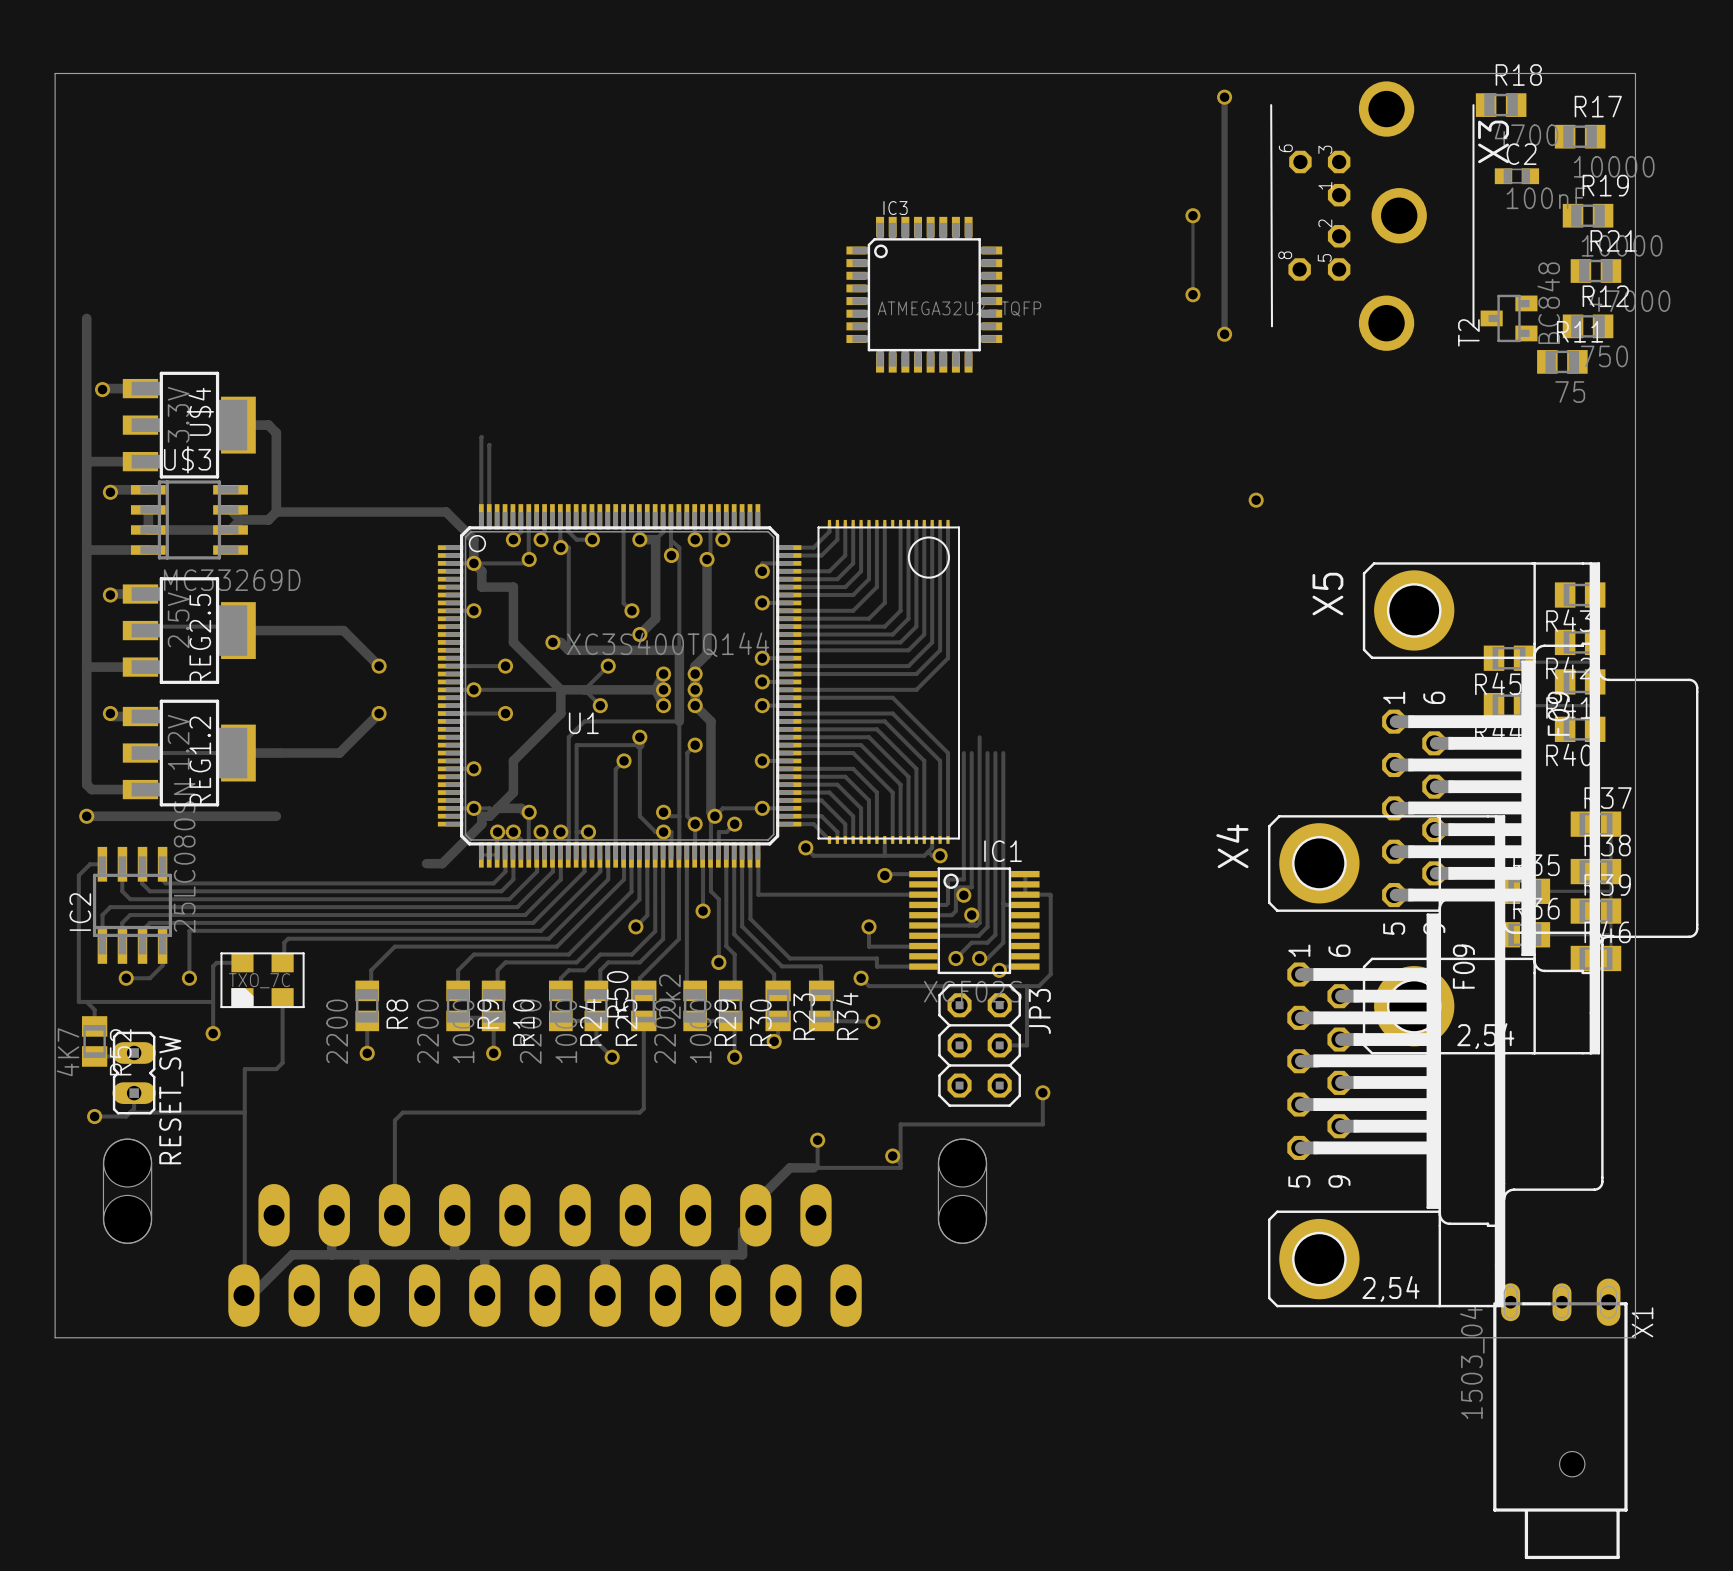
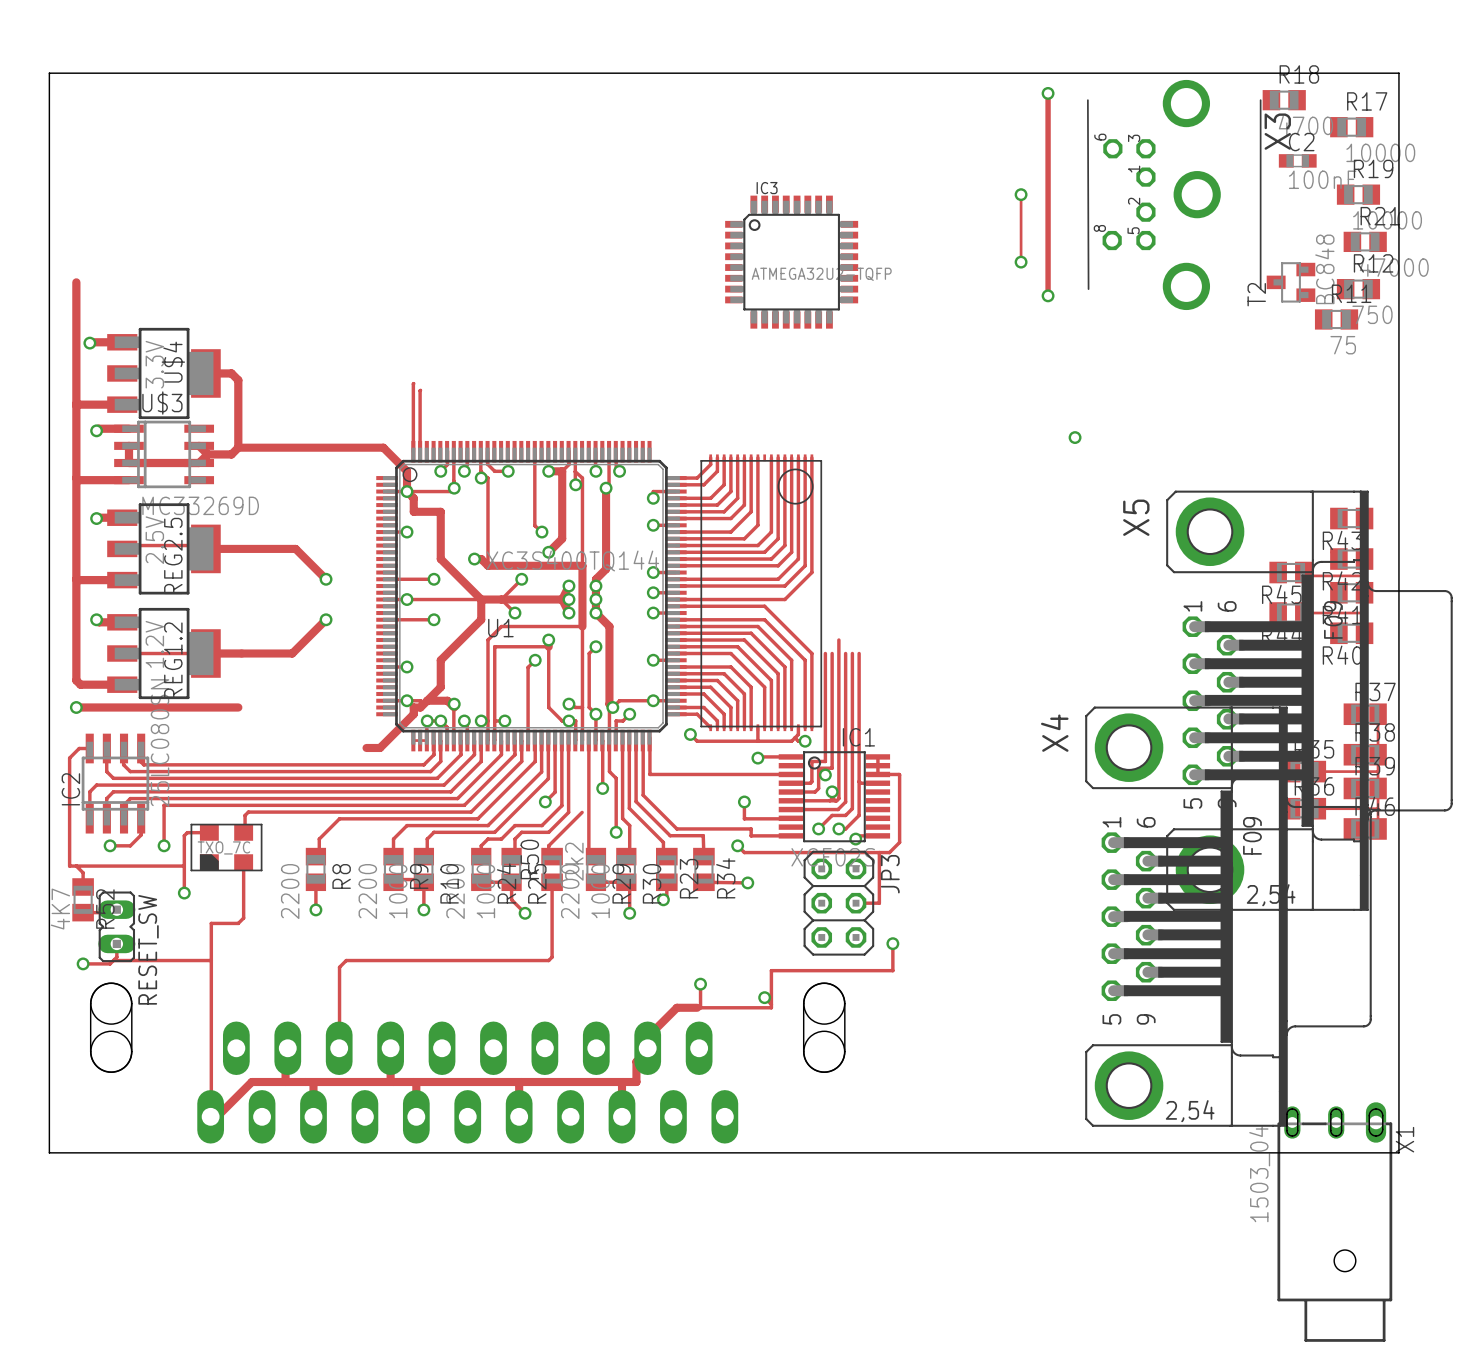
track: (678, 855) (678, 939) -> none

